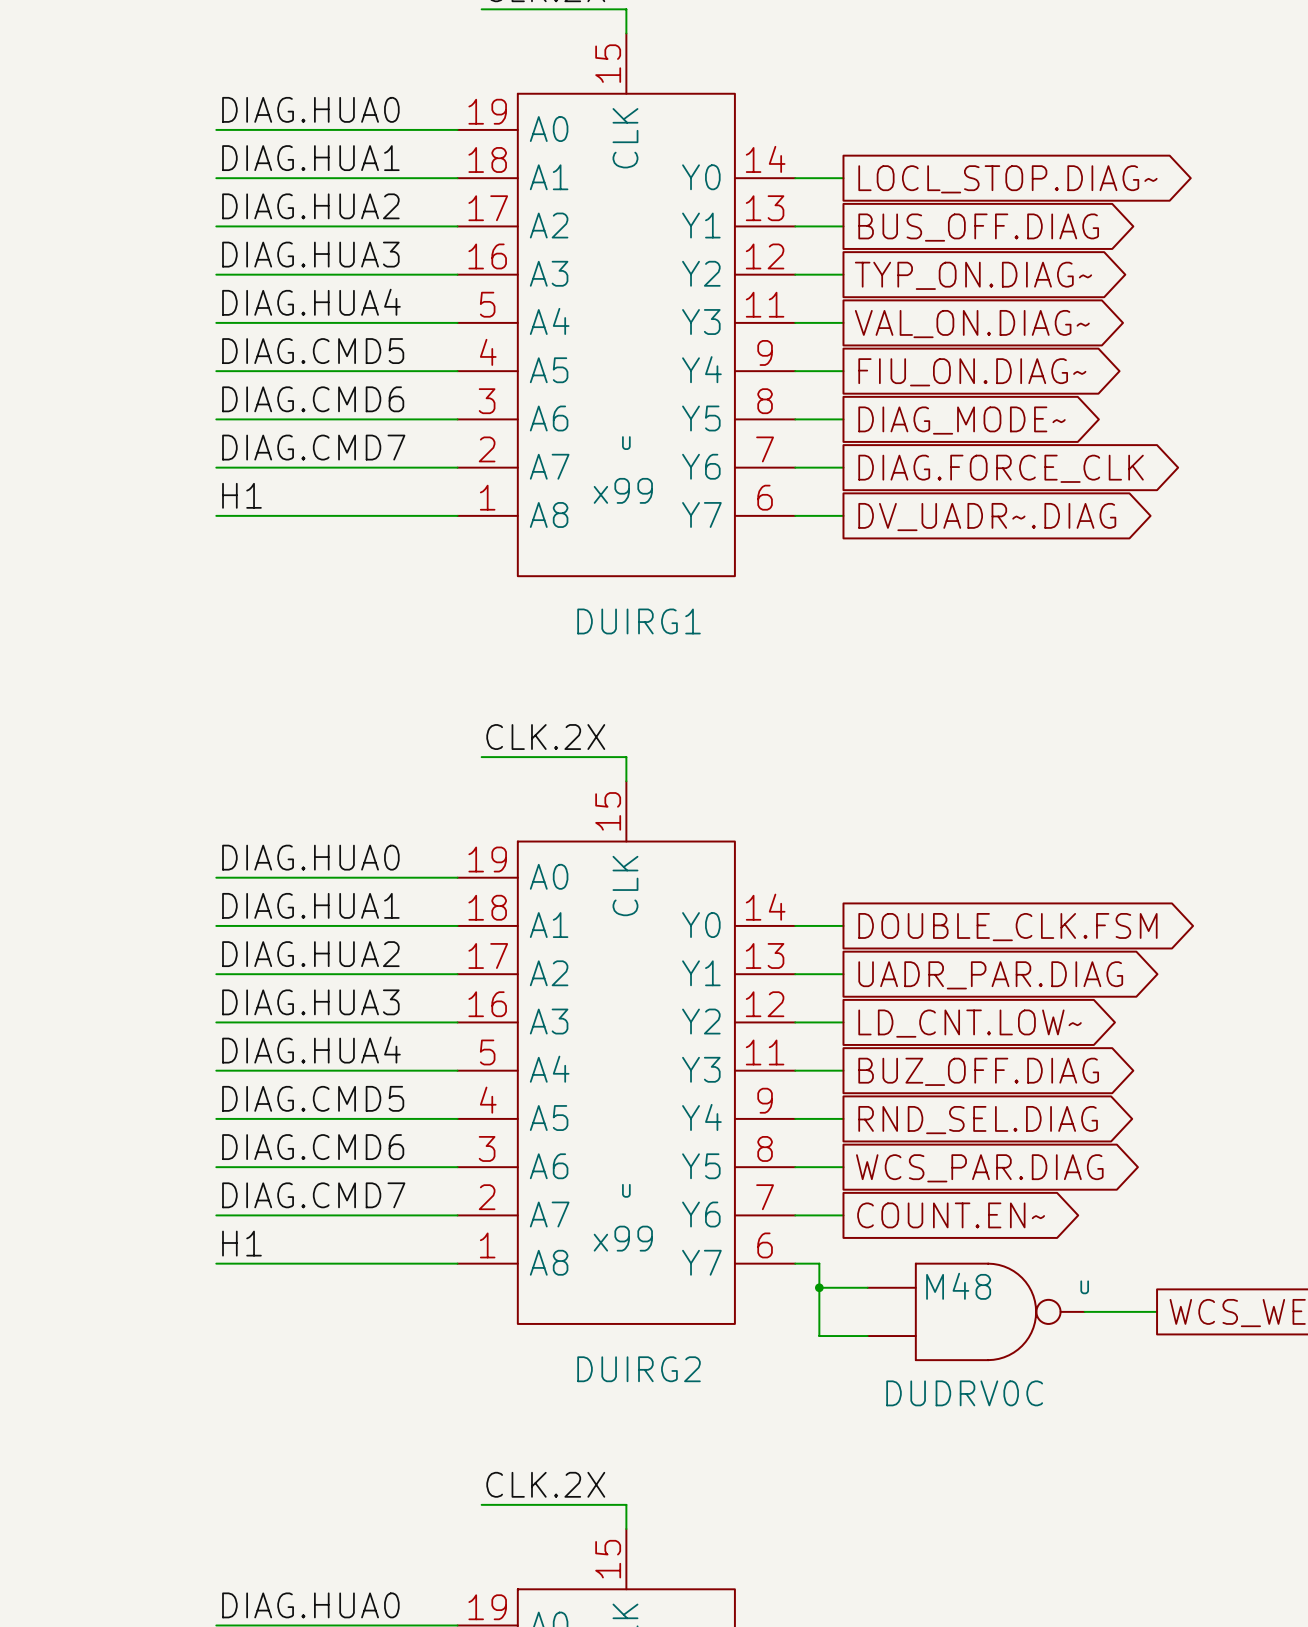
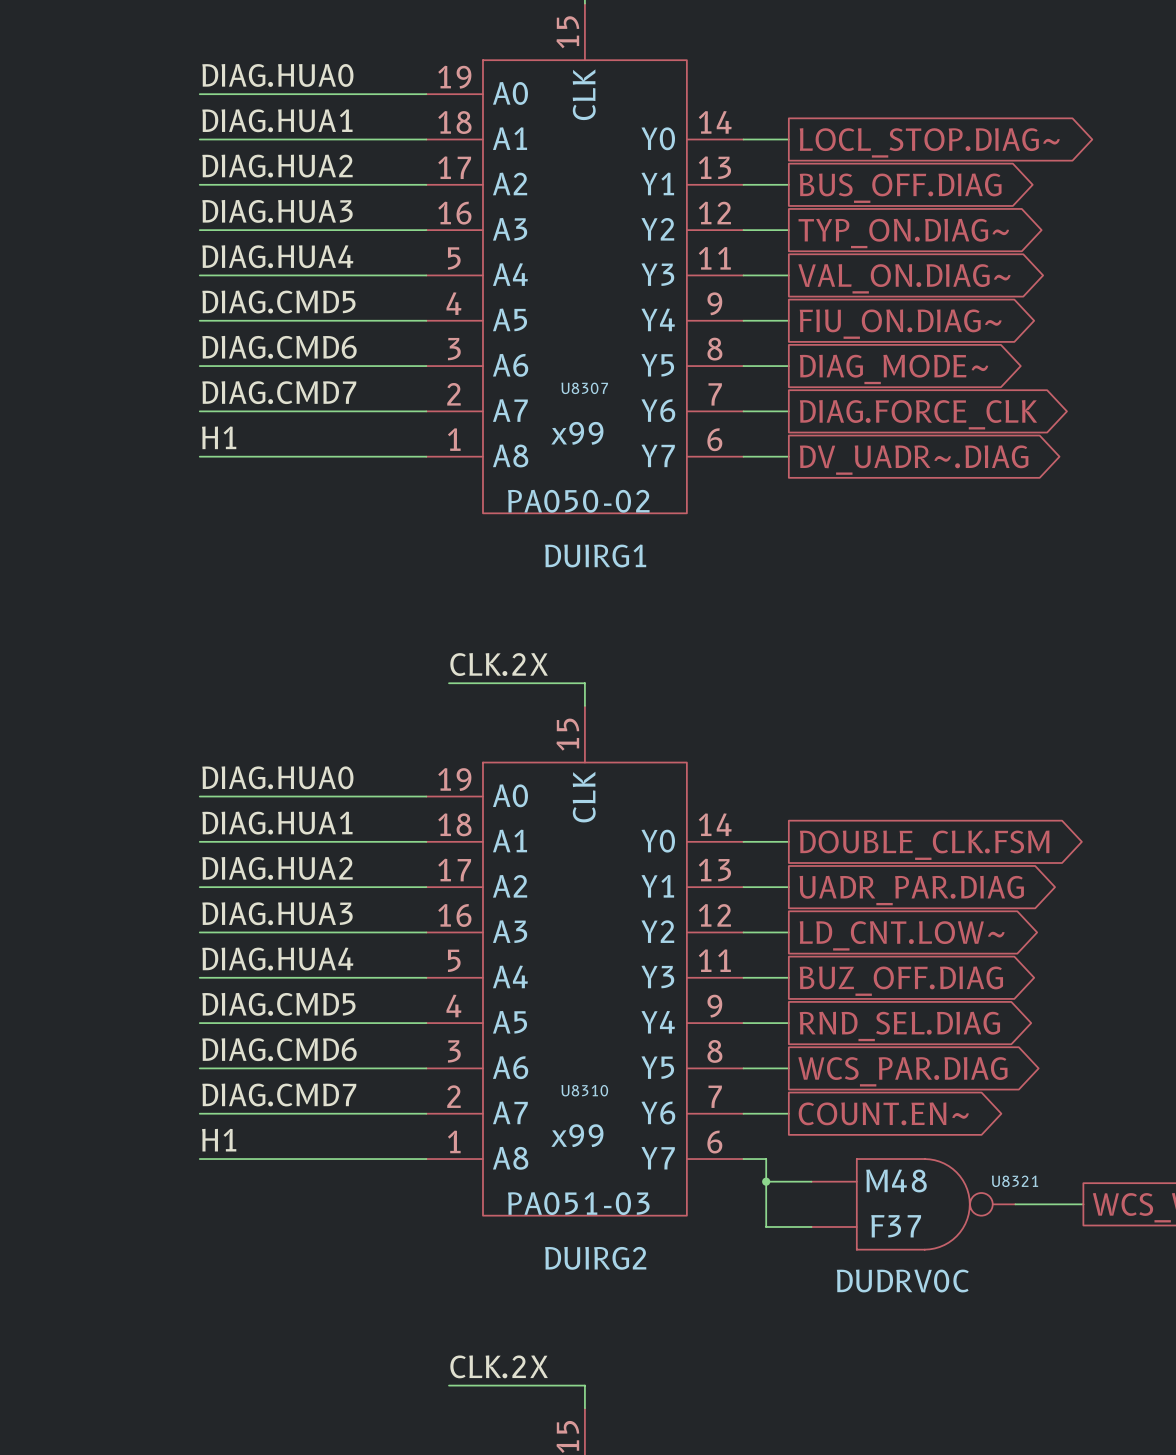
U name: U (626, 443) -> U8307 (584, 388)
U value: none -> PA050-02 (578, 501)
U name: U (626, 1190) -> U8310 (584, 1090)
U name: U (1084, 1287) -> U8321 (1015, 1181)
U value: none -> PA051-03 (578, 1203)
U value: none -> F37 (896, 1226)

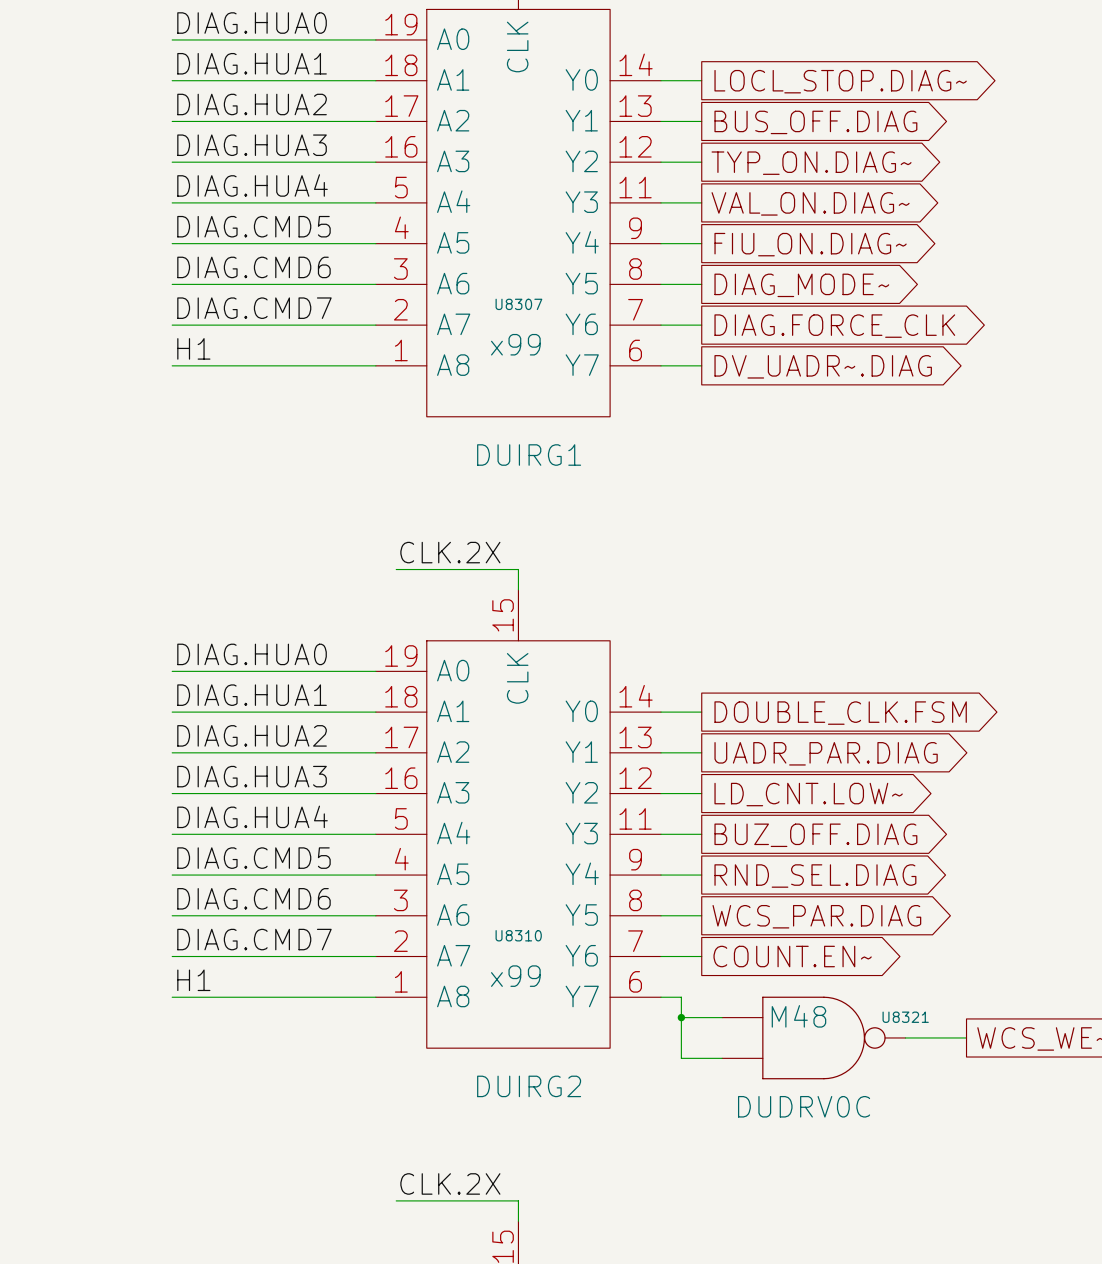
U8307 value: PA050-02 (578, 501) -> none
U8310 value: PA051-03 (578, 1203) -> none
U8321 value: F37 (896, 1226) -> none

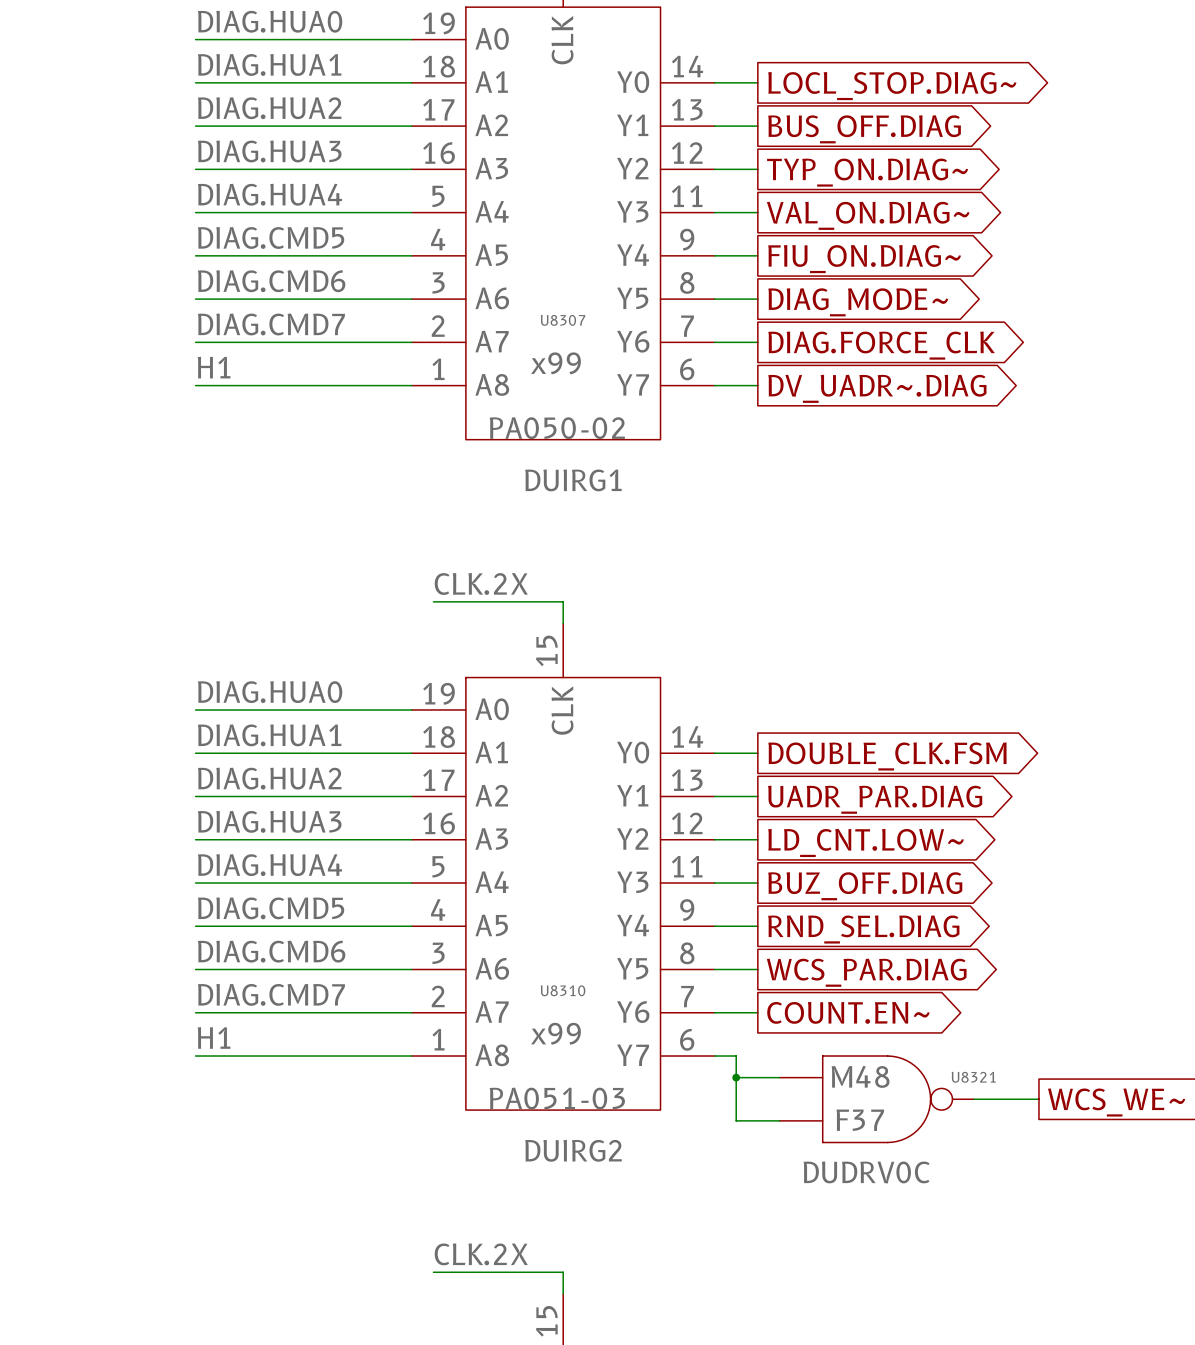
U8307 value: none -> PA050-02 (557, 428)
U8310 value: none -> PA051-03 (557, 1098)
U8321 value: none -> F37 (860, 1120)

